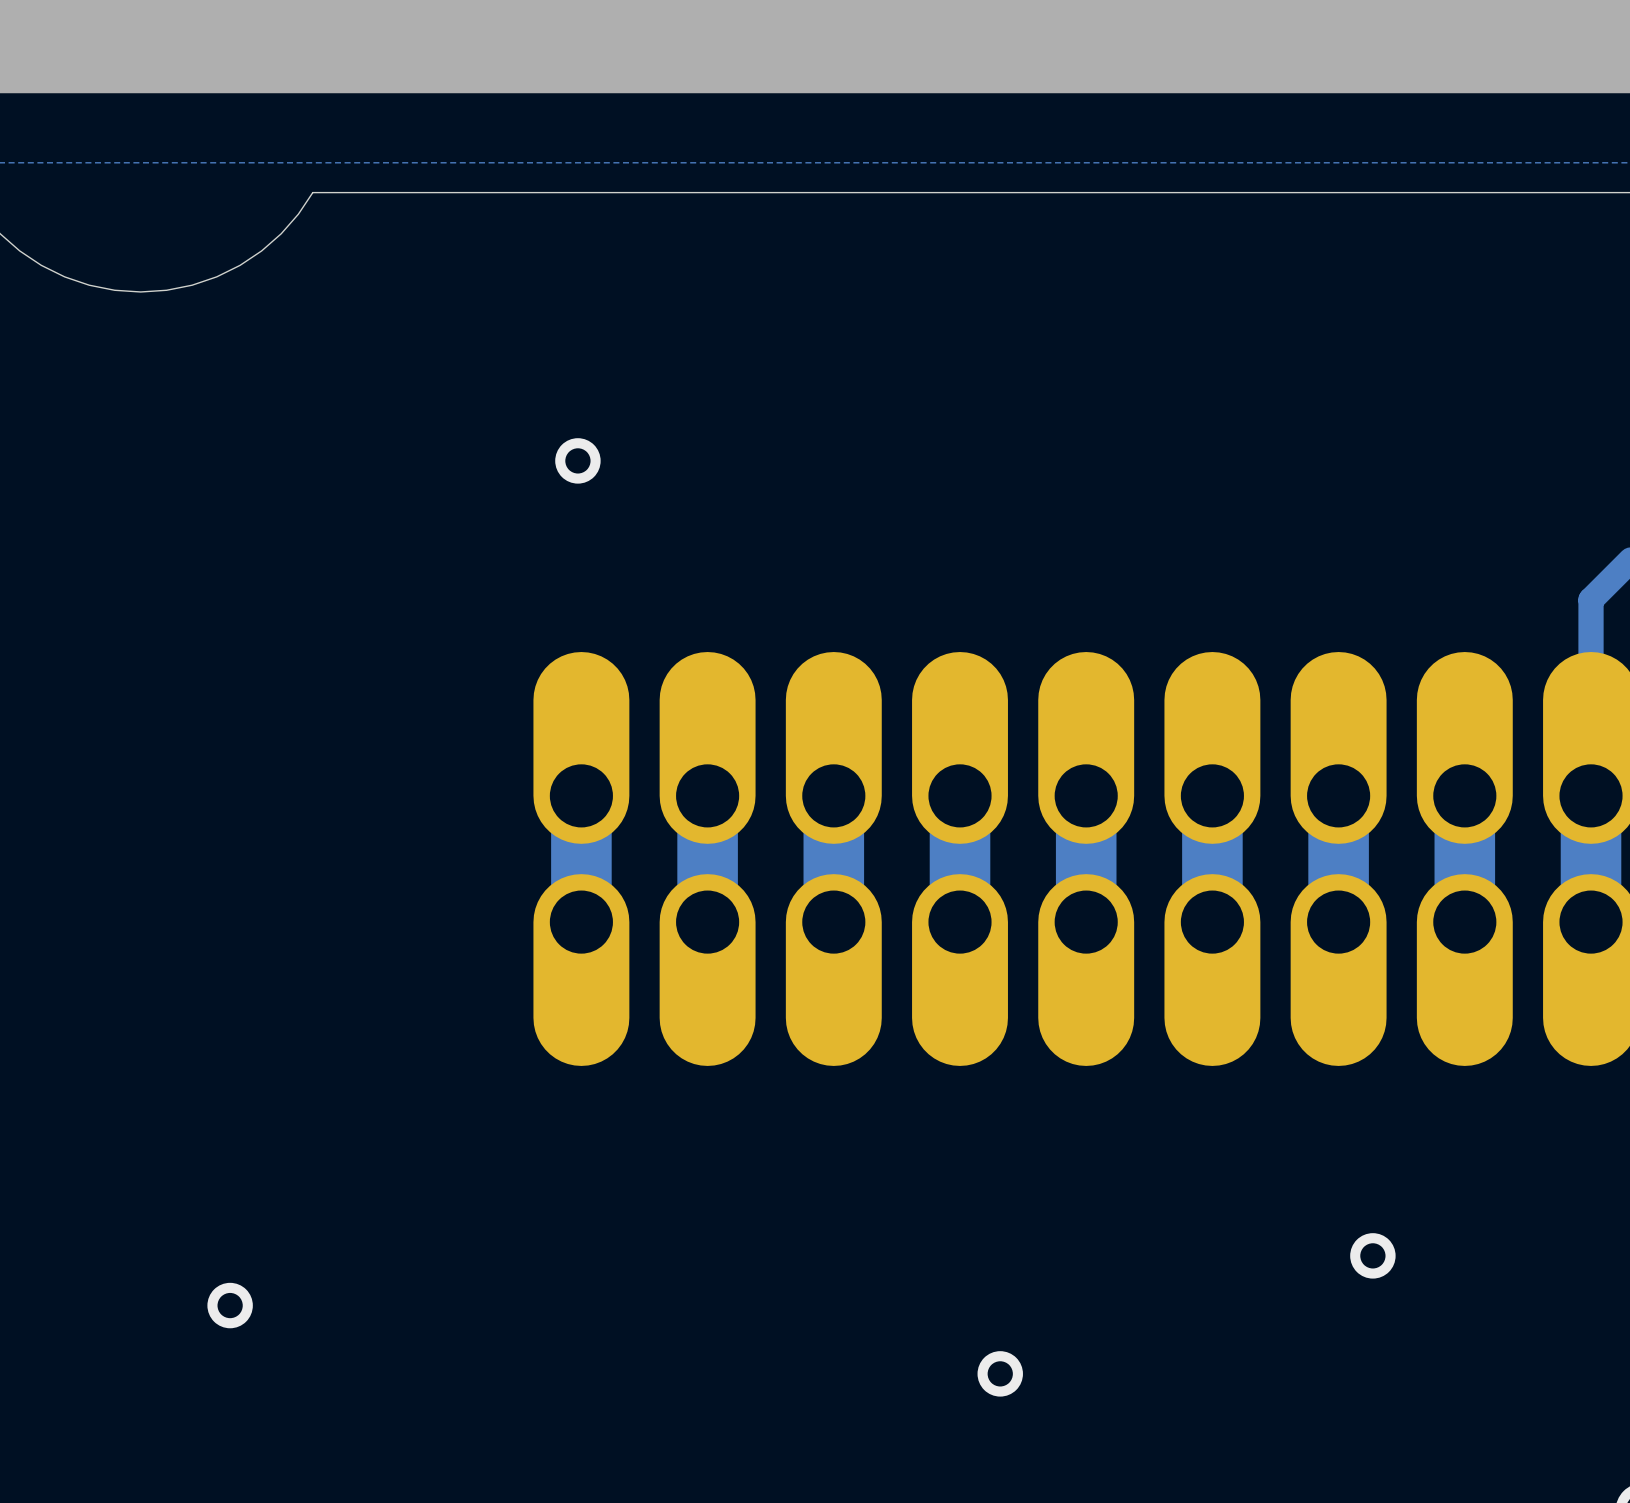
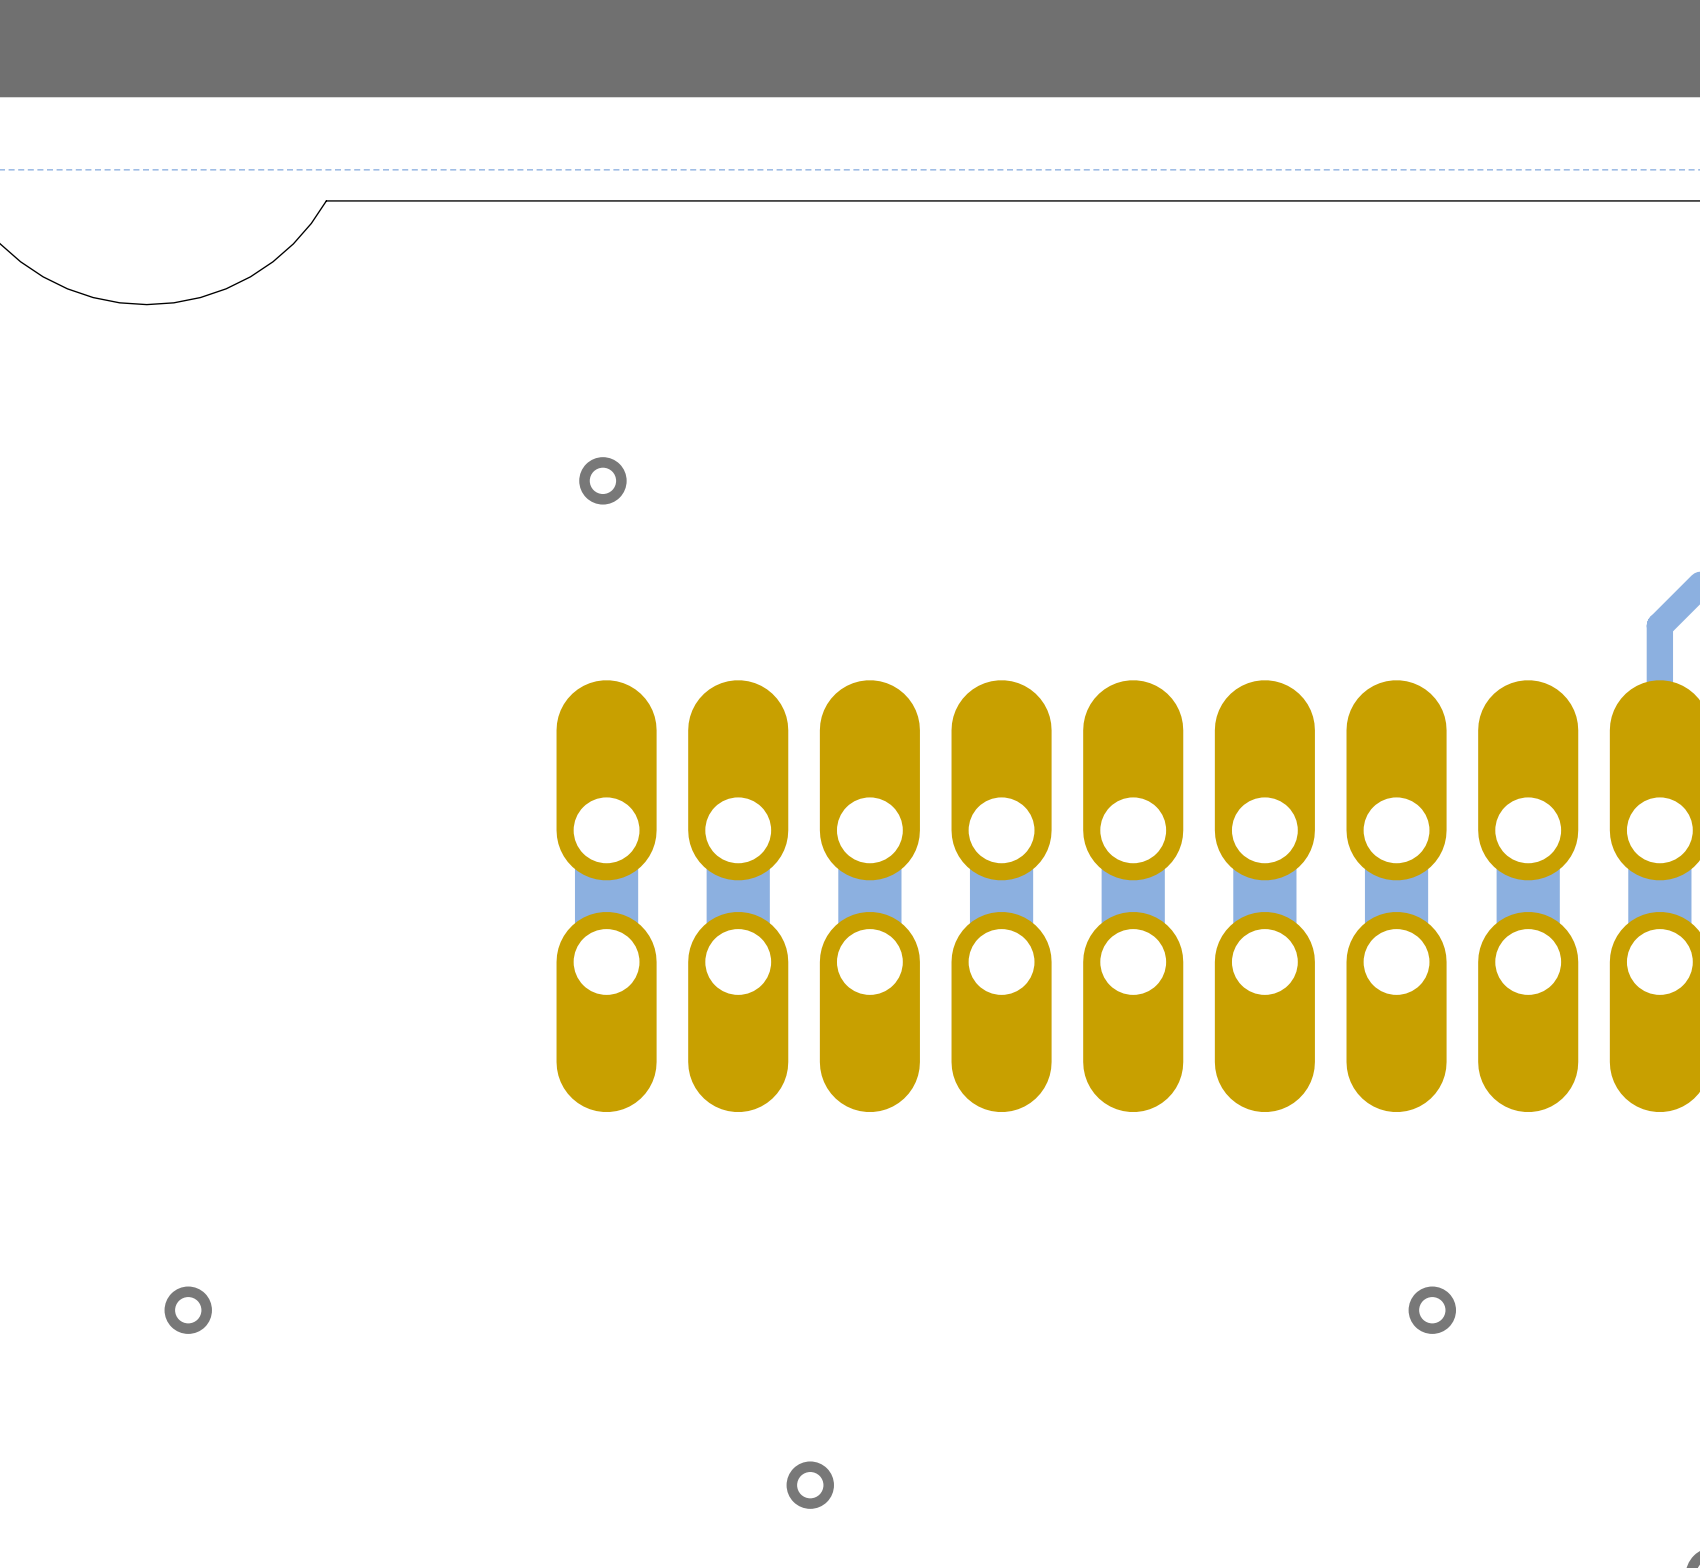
via position: (230, 1305) -> (188, 1310)
via position: (1000, 1373) -> (810, 1485)

